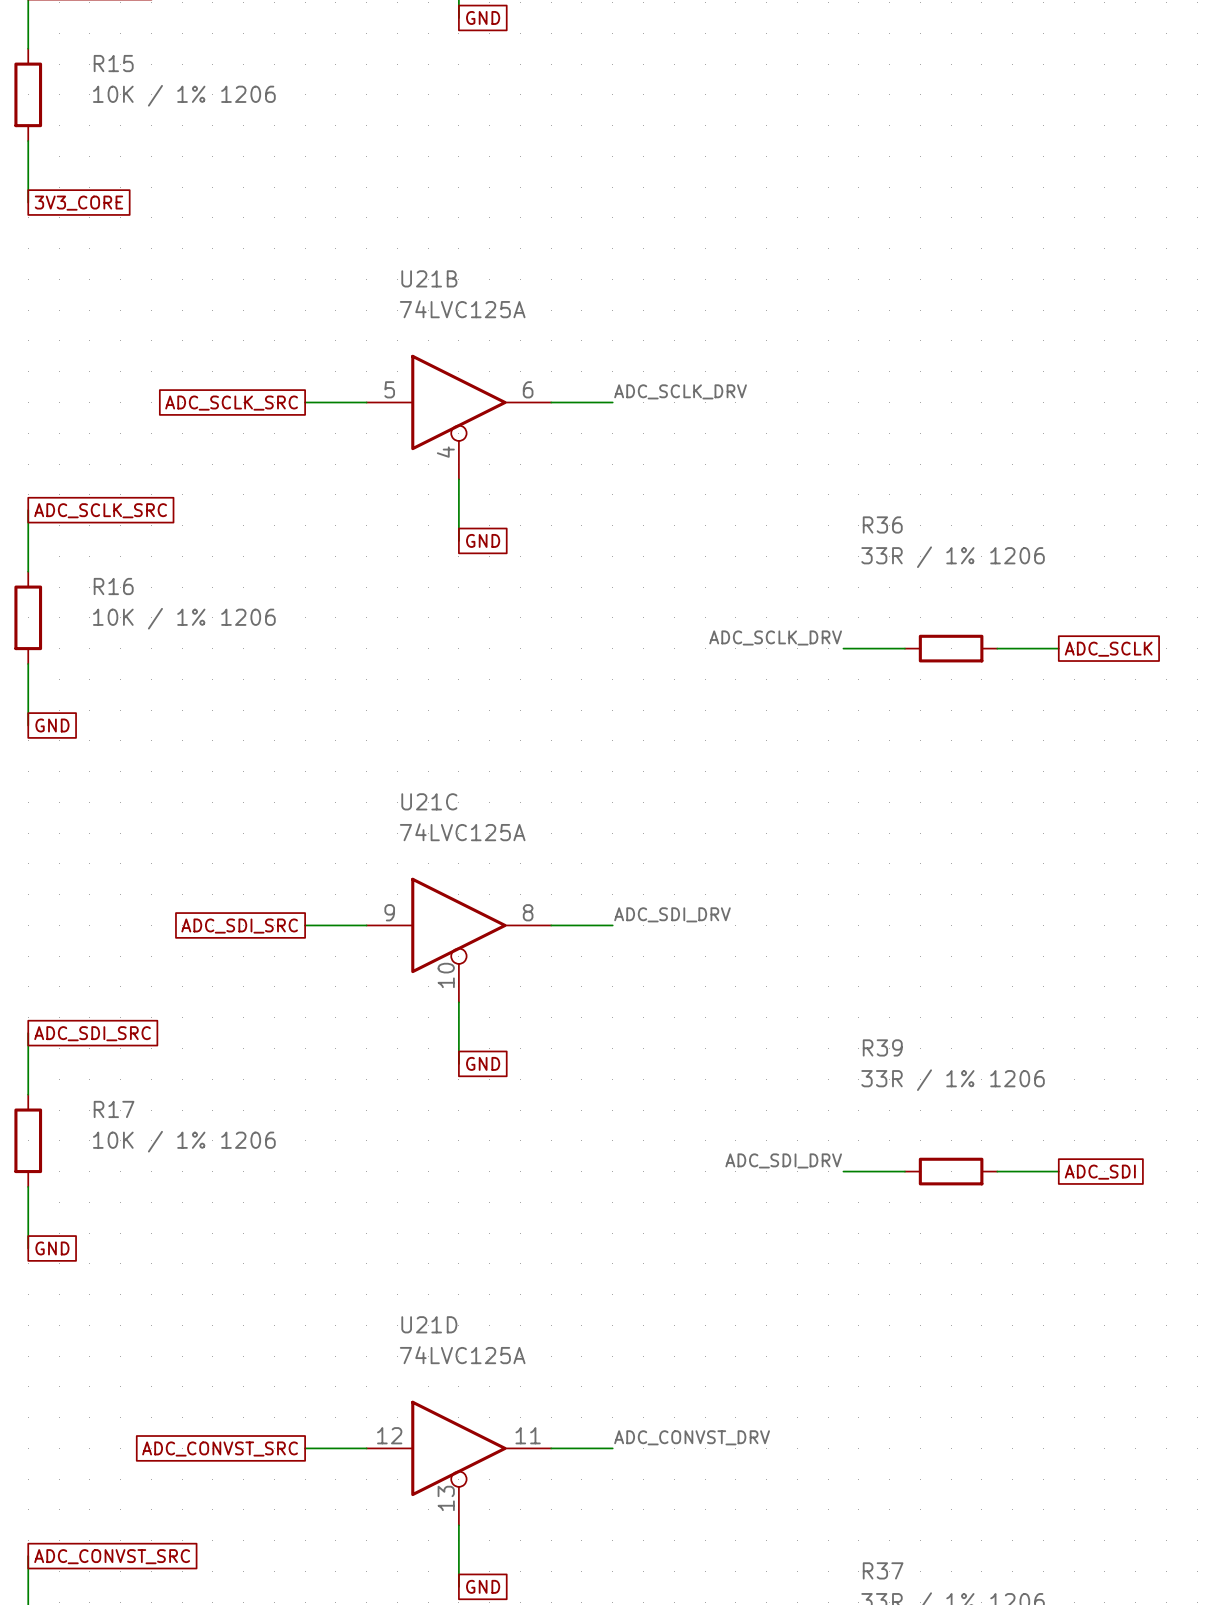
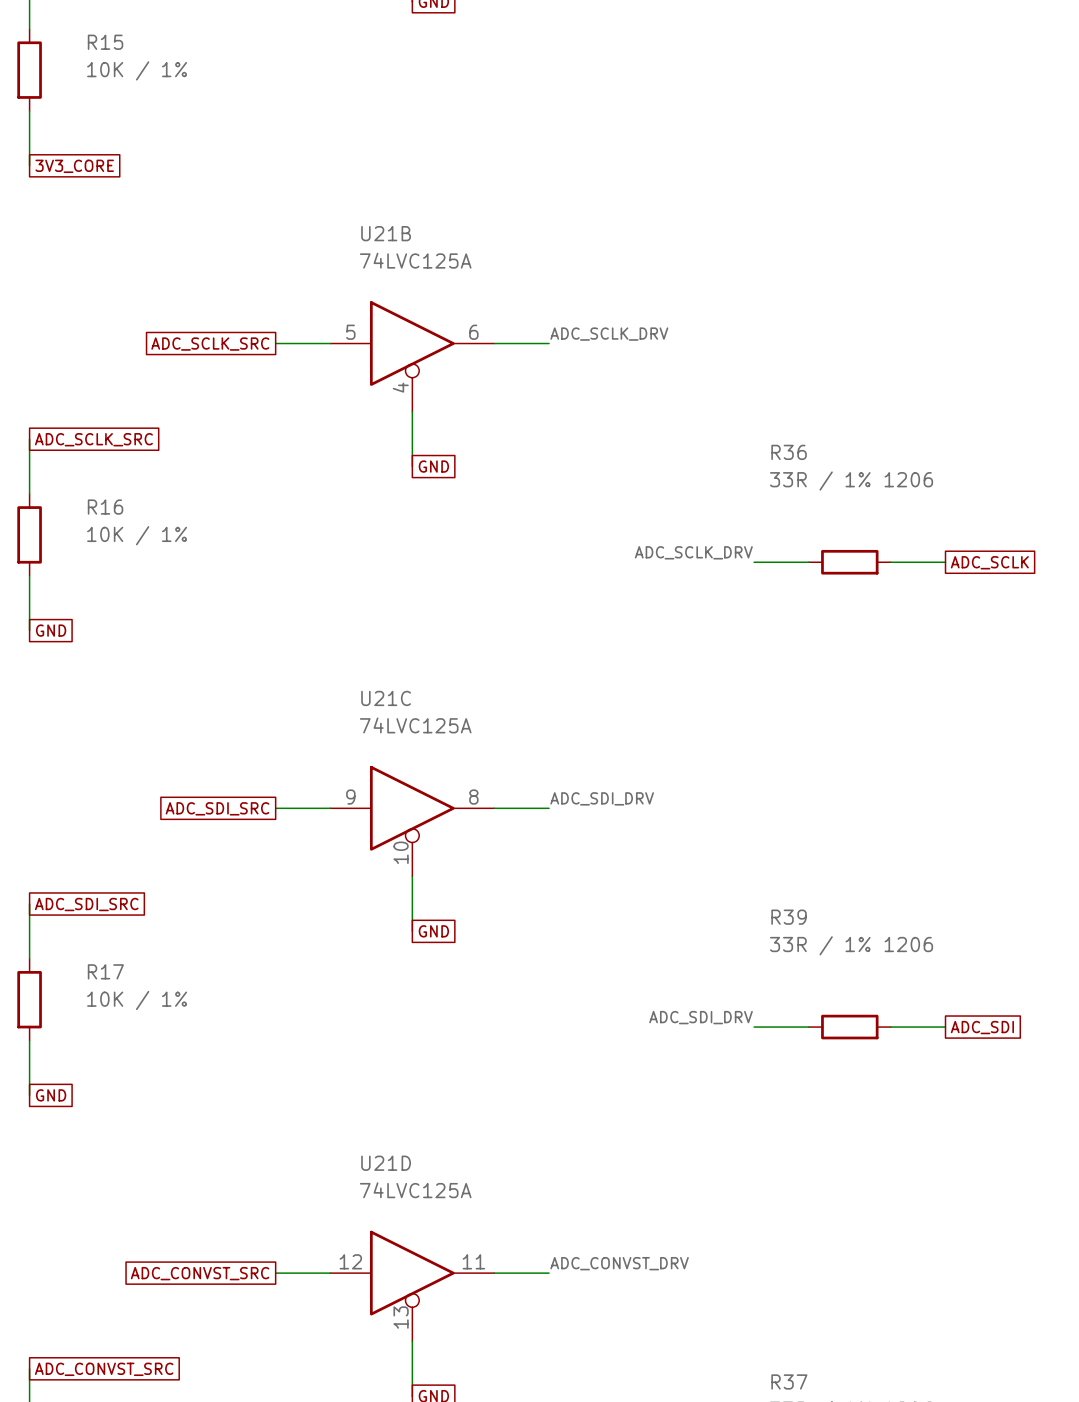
R15 value: 10K / 1% 1206 (184, 95) -> 10K / 1% (137, 70)
R16 value: 10K / 1% 1206 (184, 618) -> 10K / 1% (137, 535)
R17 value: 10K / 1% 1206 (184, 1141) -> 10K / 1% (137, 1000)

